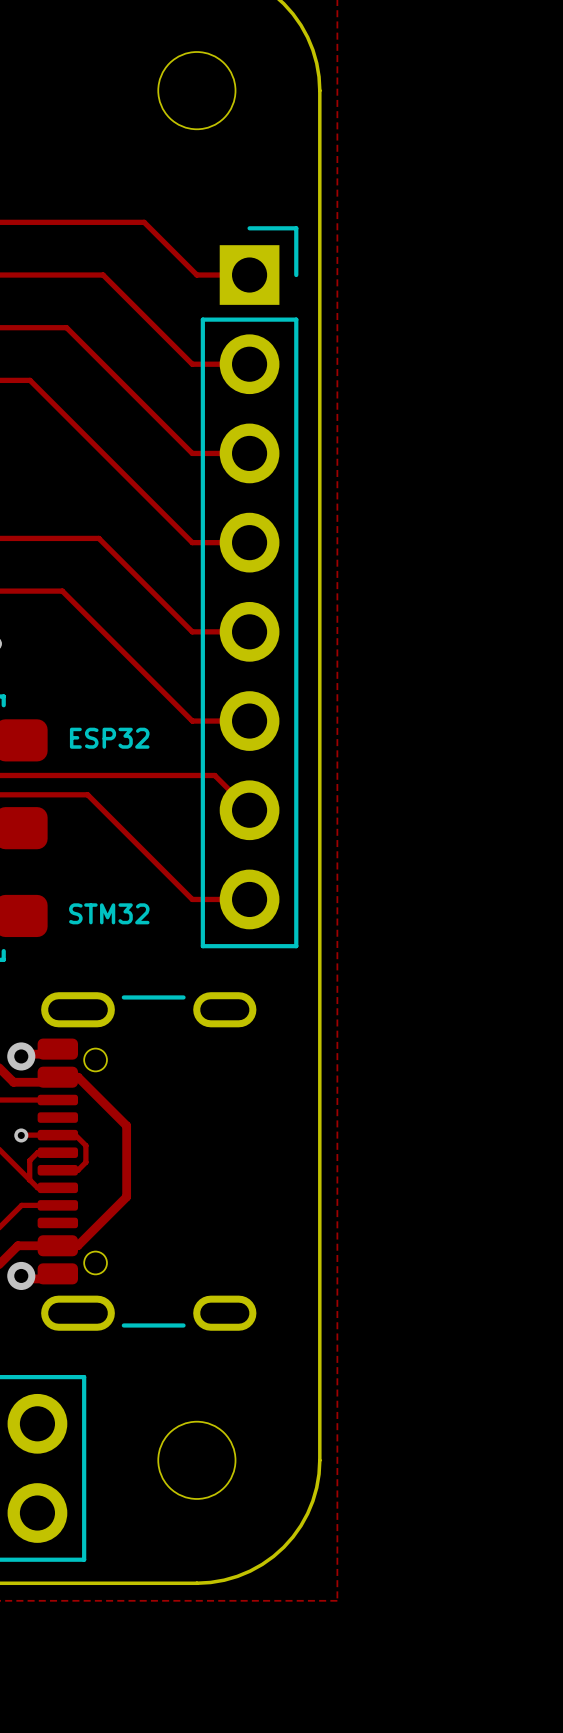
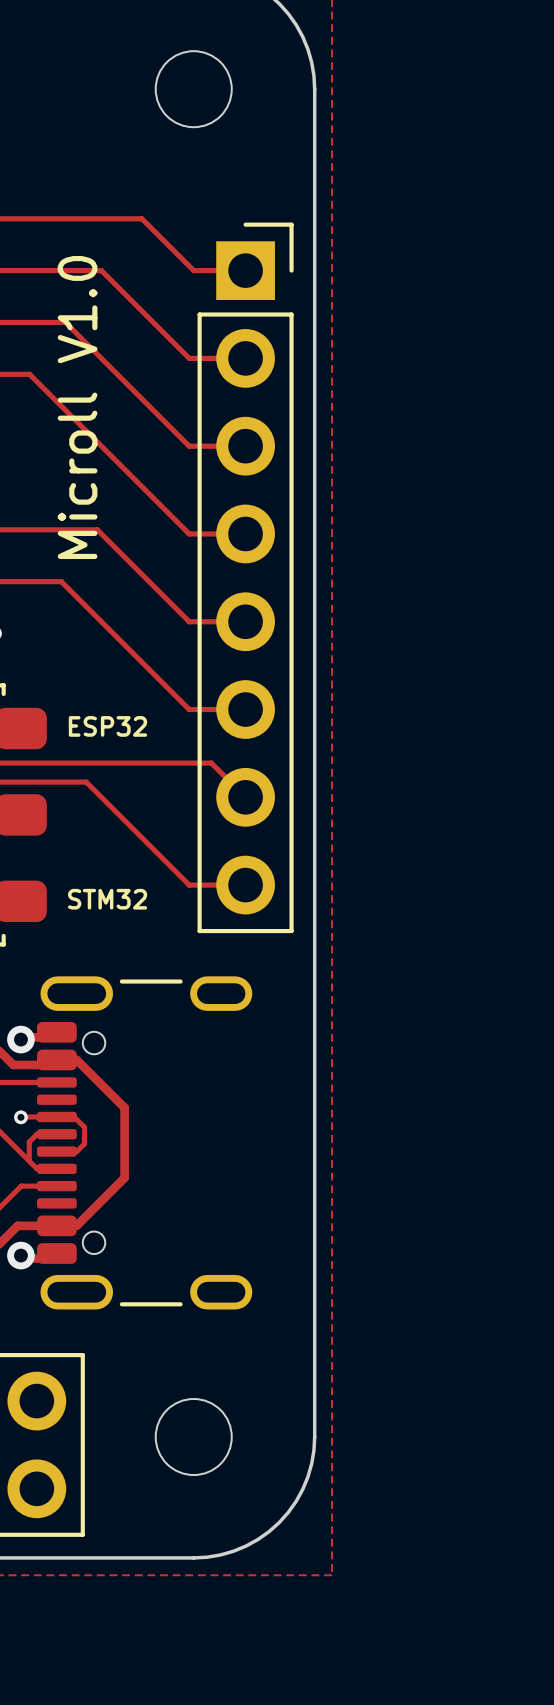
text: none -> Microll V1.0 (77, 407)

